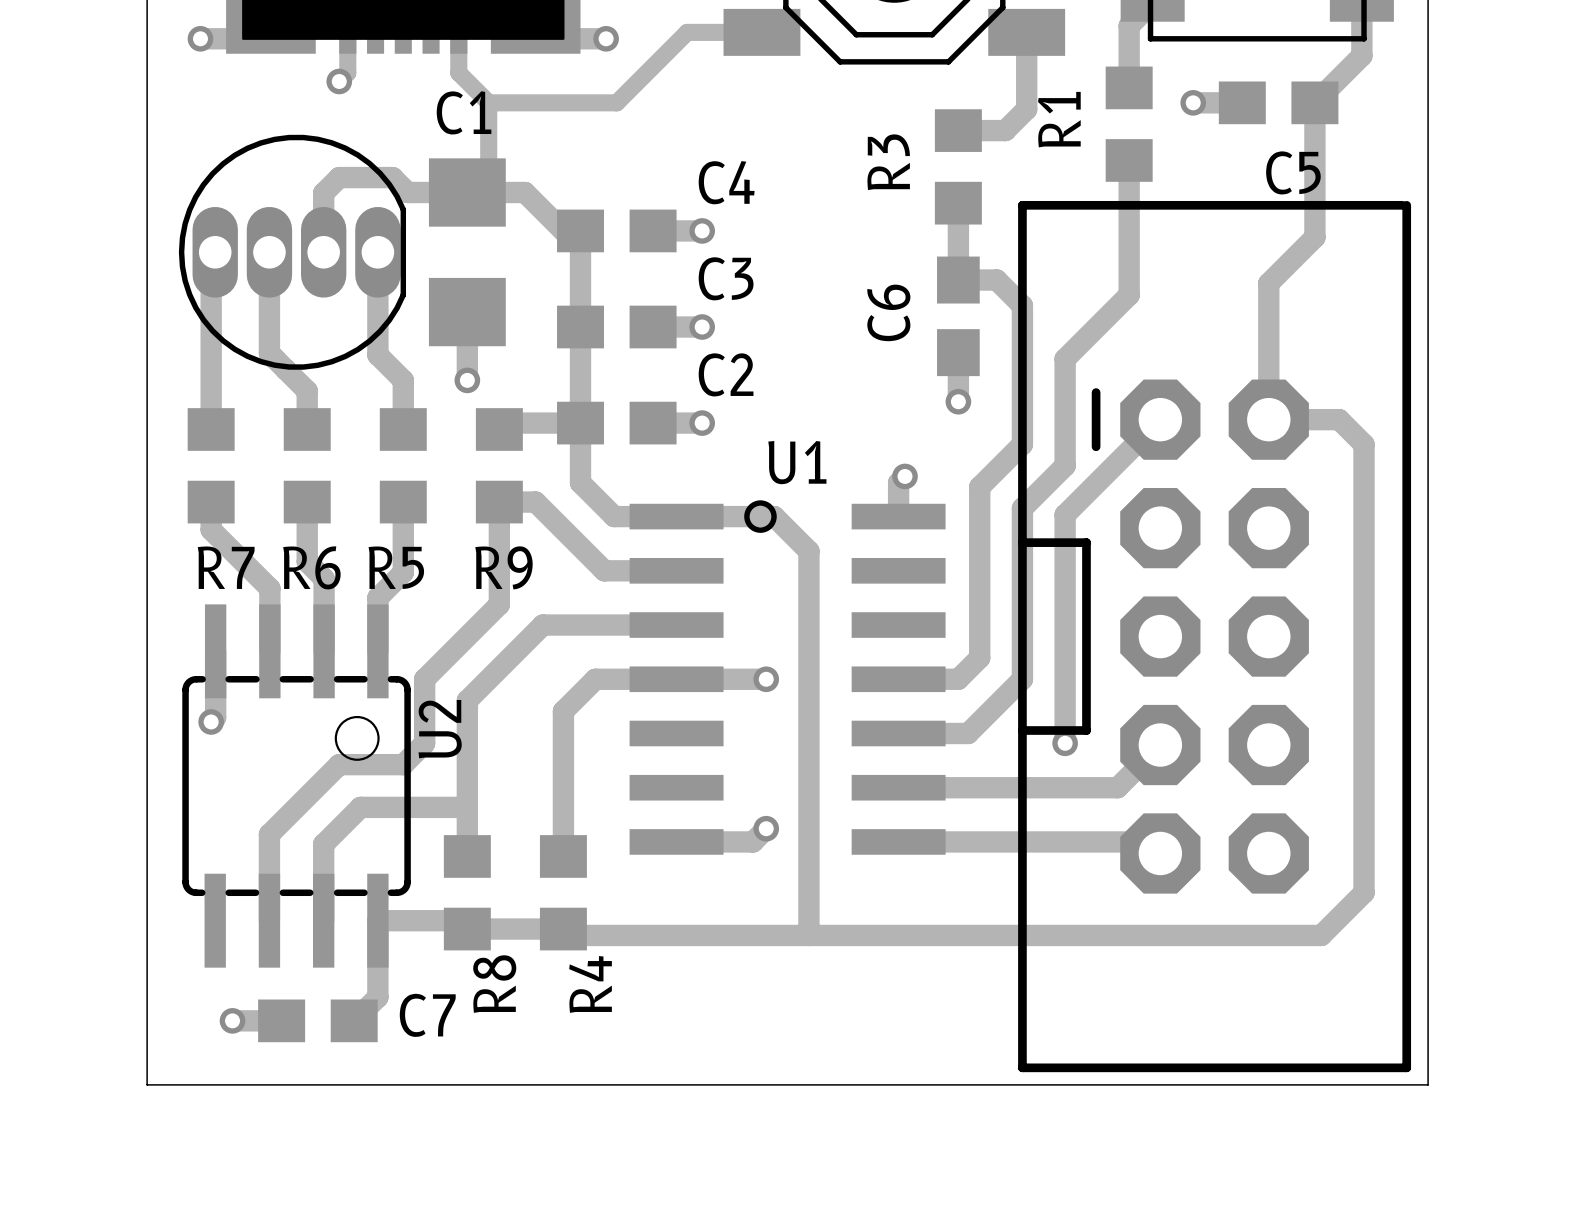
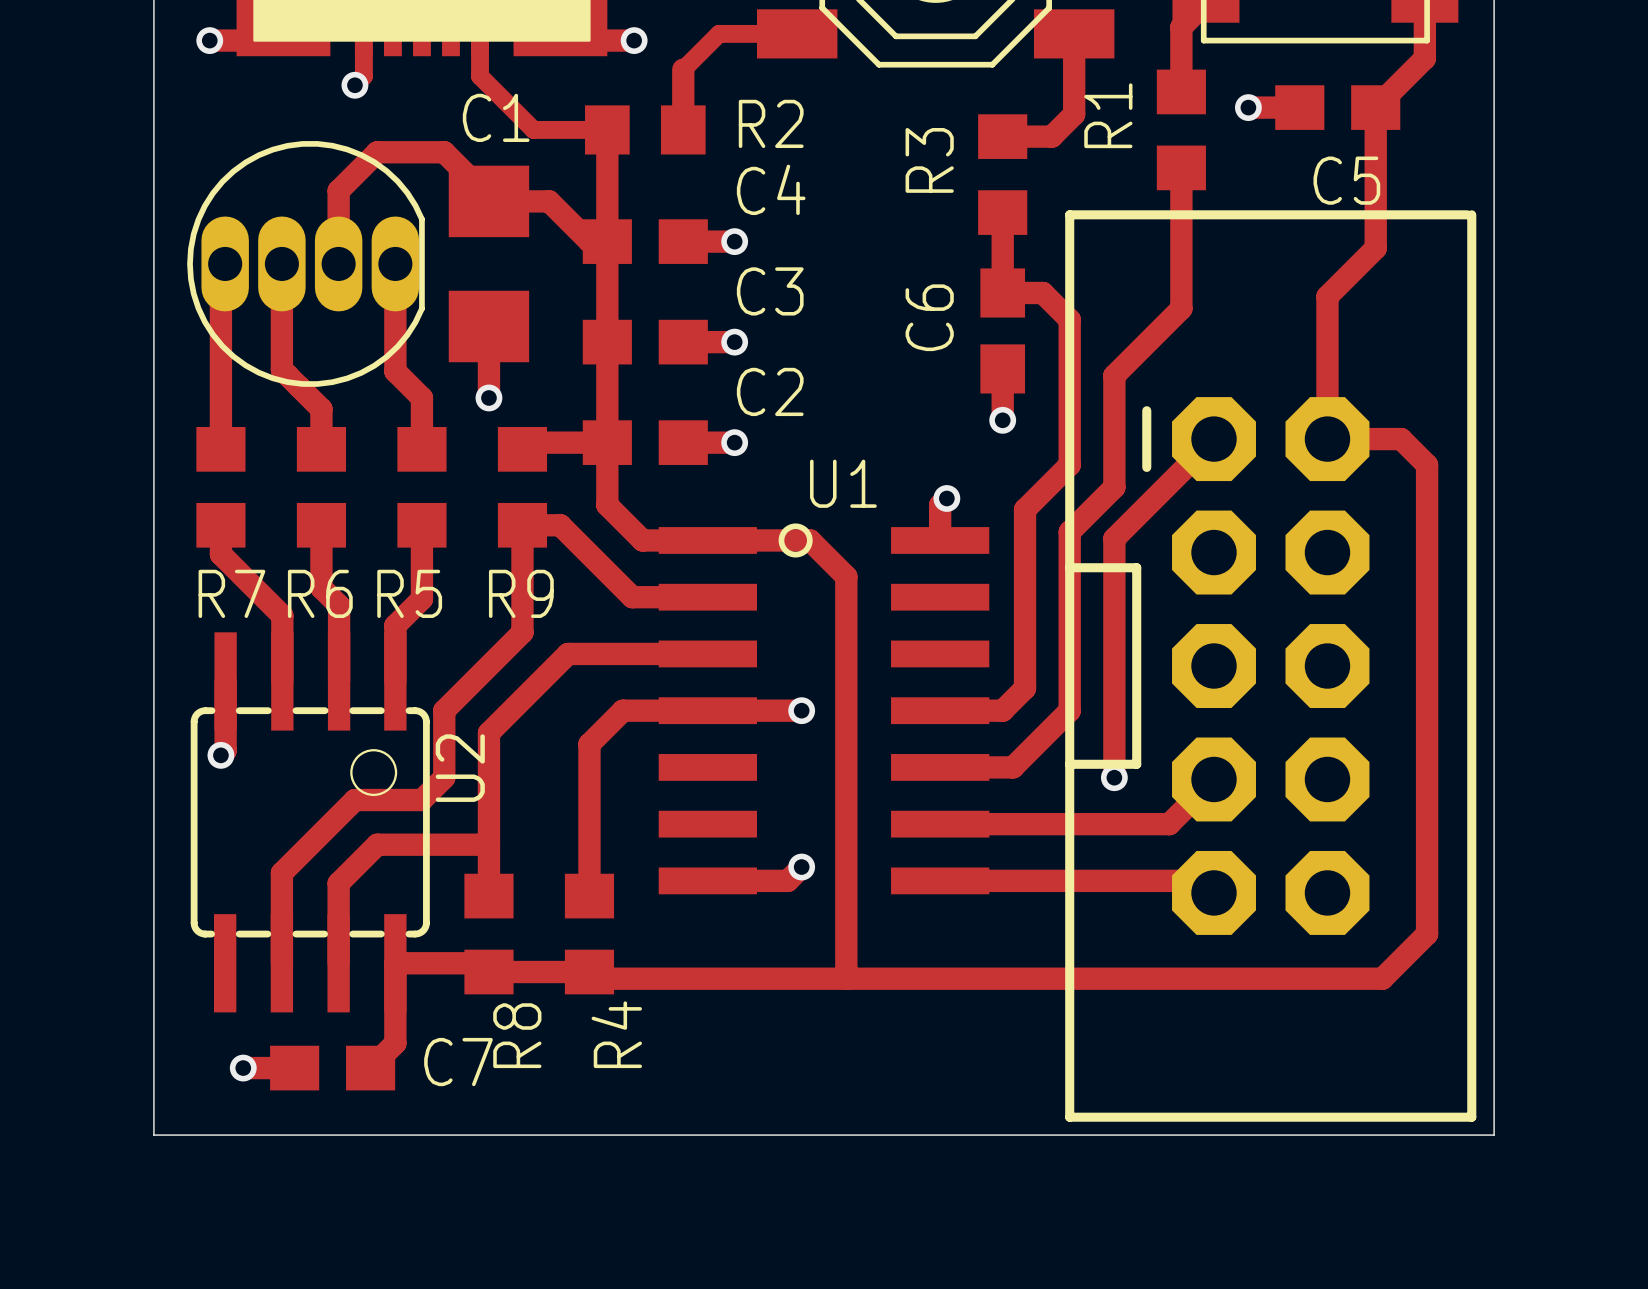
track: (653, 66) (616, 102) (488, 102) (488, 171) (467, 192) (407, 192) (392, 177) (339, 177) (323, 193) -> (488, 196) (444, 152) (377, 152) (338, 190) (338, 202)
track: none -> (683, 69) (683, 129)
track: none -> (511, 107) (533, 129) (607, 129) (607, 241)
R2: none -> (645, 129)

